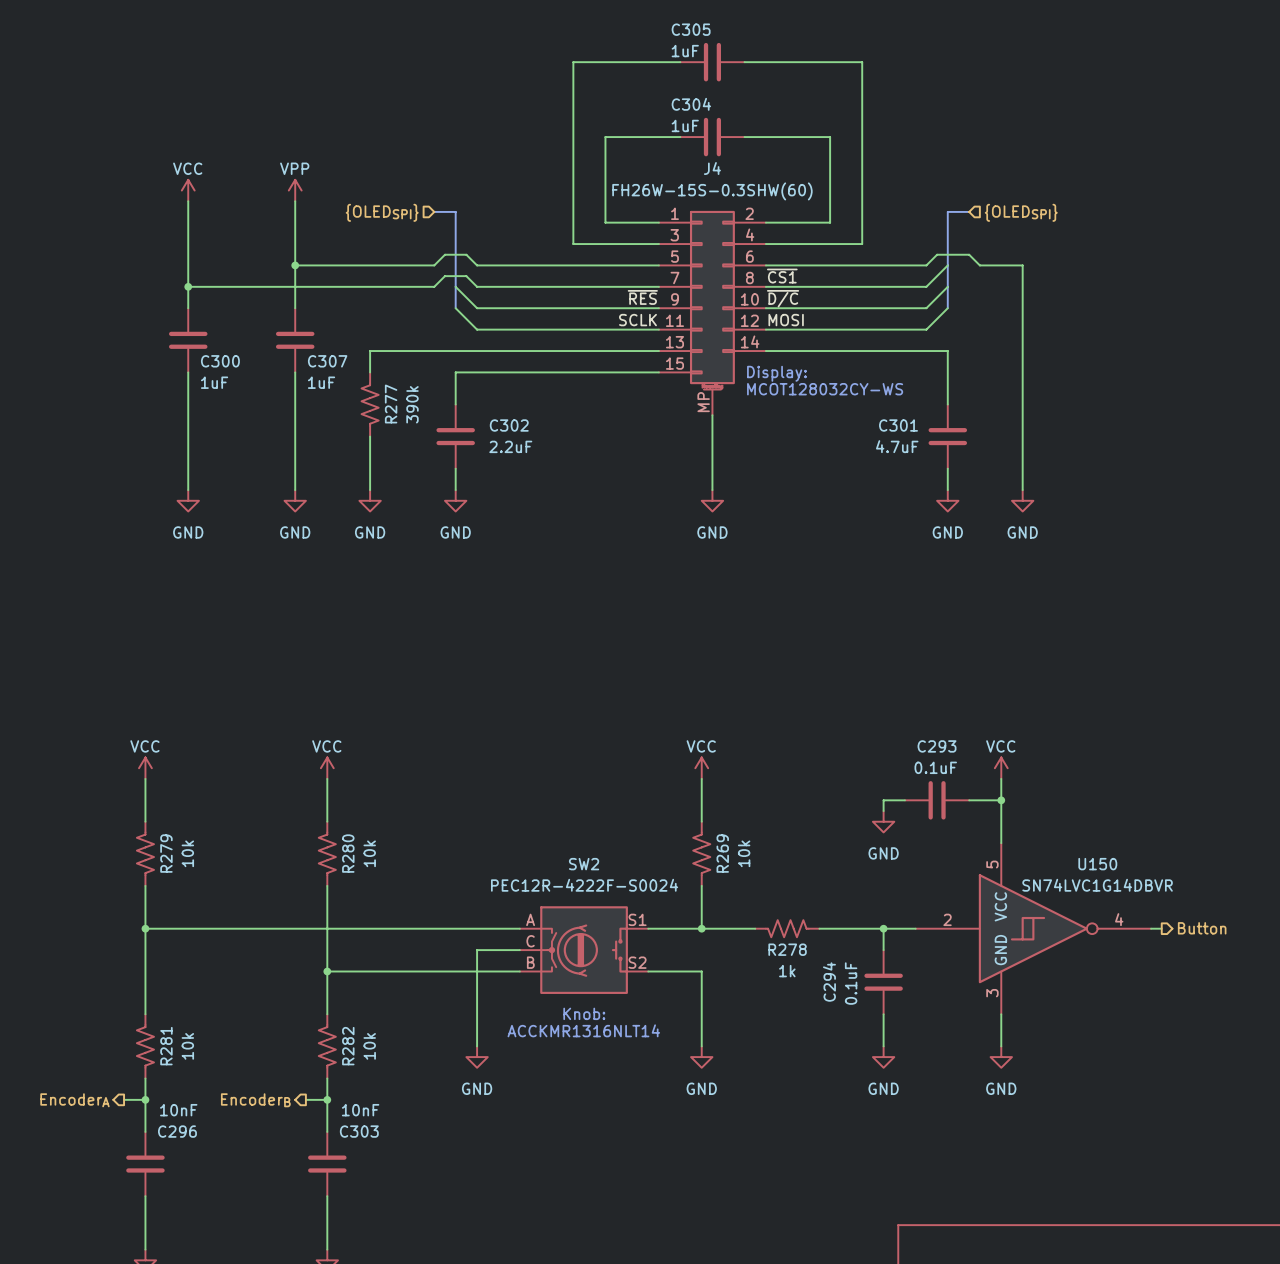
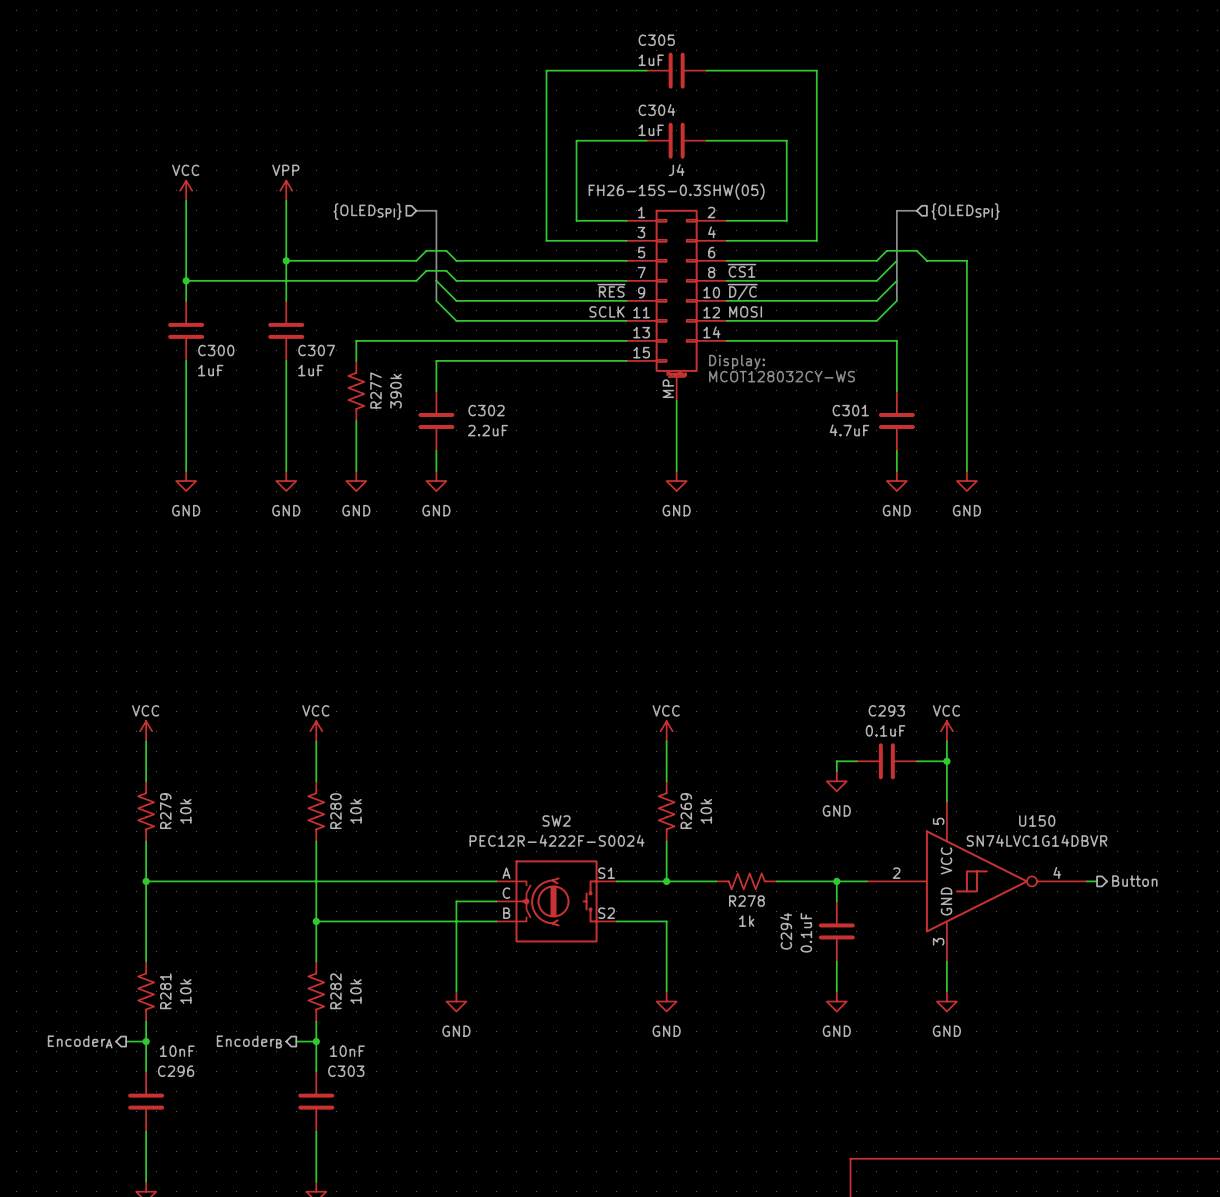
J4 value: FH26W-15S-0.3SHW(60) (712, 191) -> FH26-15S-0.3SHW(05) (676, 191)
text: Knob: (584, 1013) -> none
text: ACCKMR1316NLT14 (583, 1030) -> none

